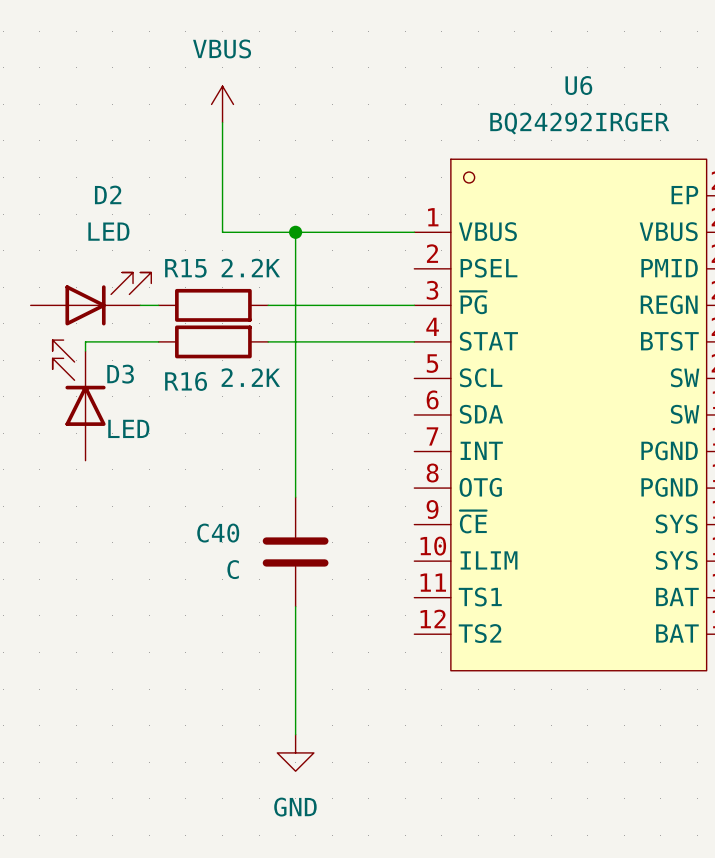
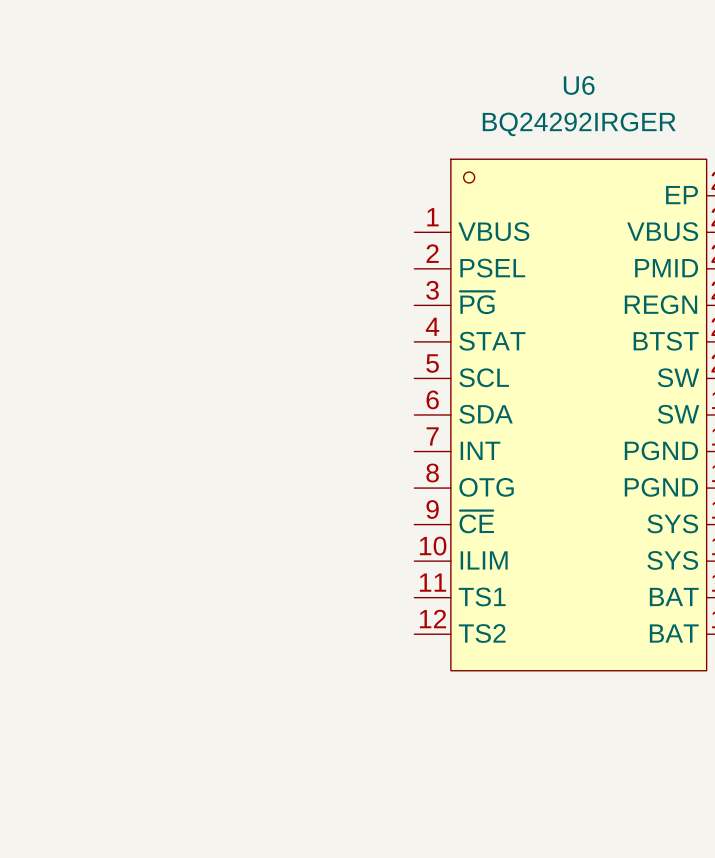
power symbol: VBUS (222, 104) -> none
wire: (222, 122) (222, 232) (414, 232) -> none
wire: (295, 232) (295, 497) -> none
junction: (295, 232) -> none
D2: LED (91, 298) -> none
wire: (140, 305) (158, 305) -> none
R15: 2.2K (213, 305) -> none
wire: (268, 305) (414, 305) -> none
wire: (158, 341) (85, 341) (85, 351) -> none
R16: 2.2K (213, 341) -> none
wire: (268, 341) (414, 341) -> none
D3: LED (79, 400) -> none
C40: C (295, 551) -> none
wire: (295, 606) (295, 734) -> none
power symbol: GND (295, 752) -> none

